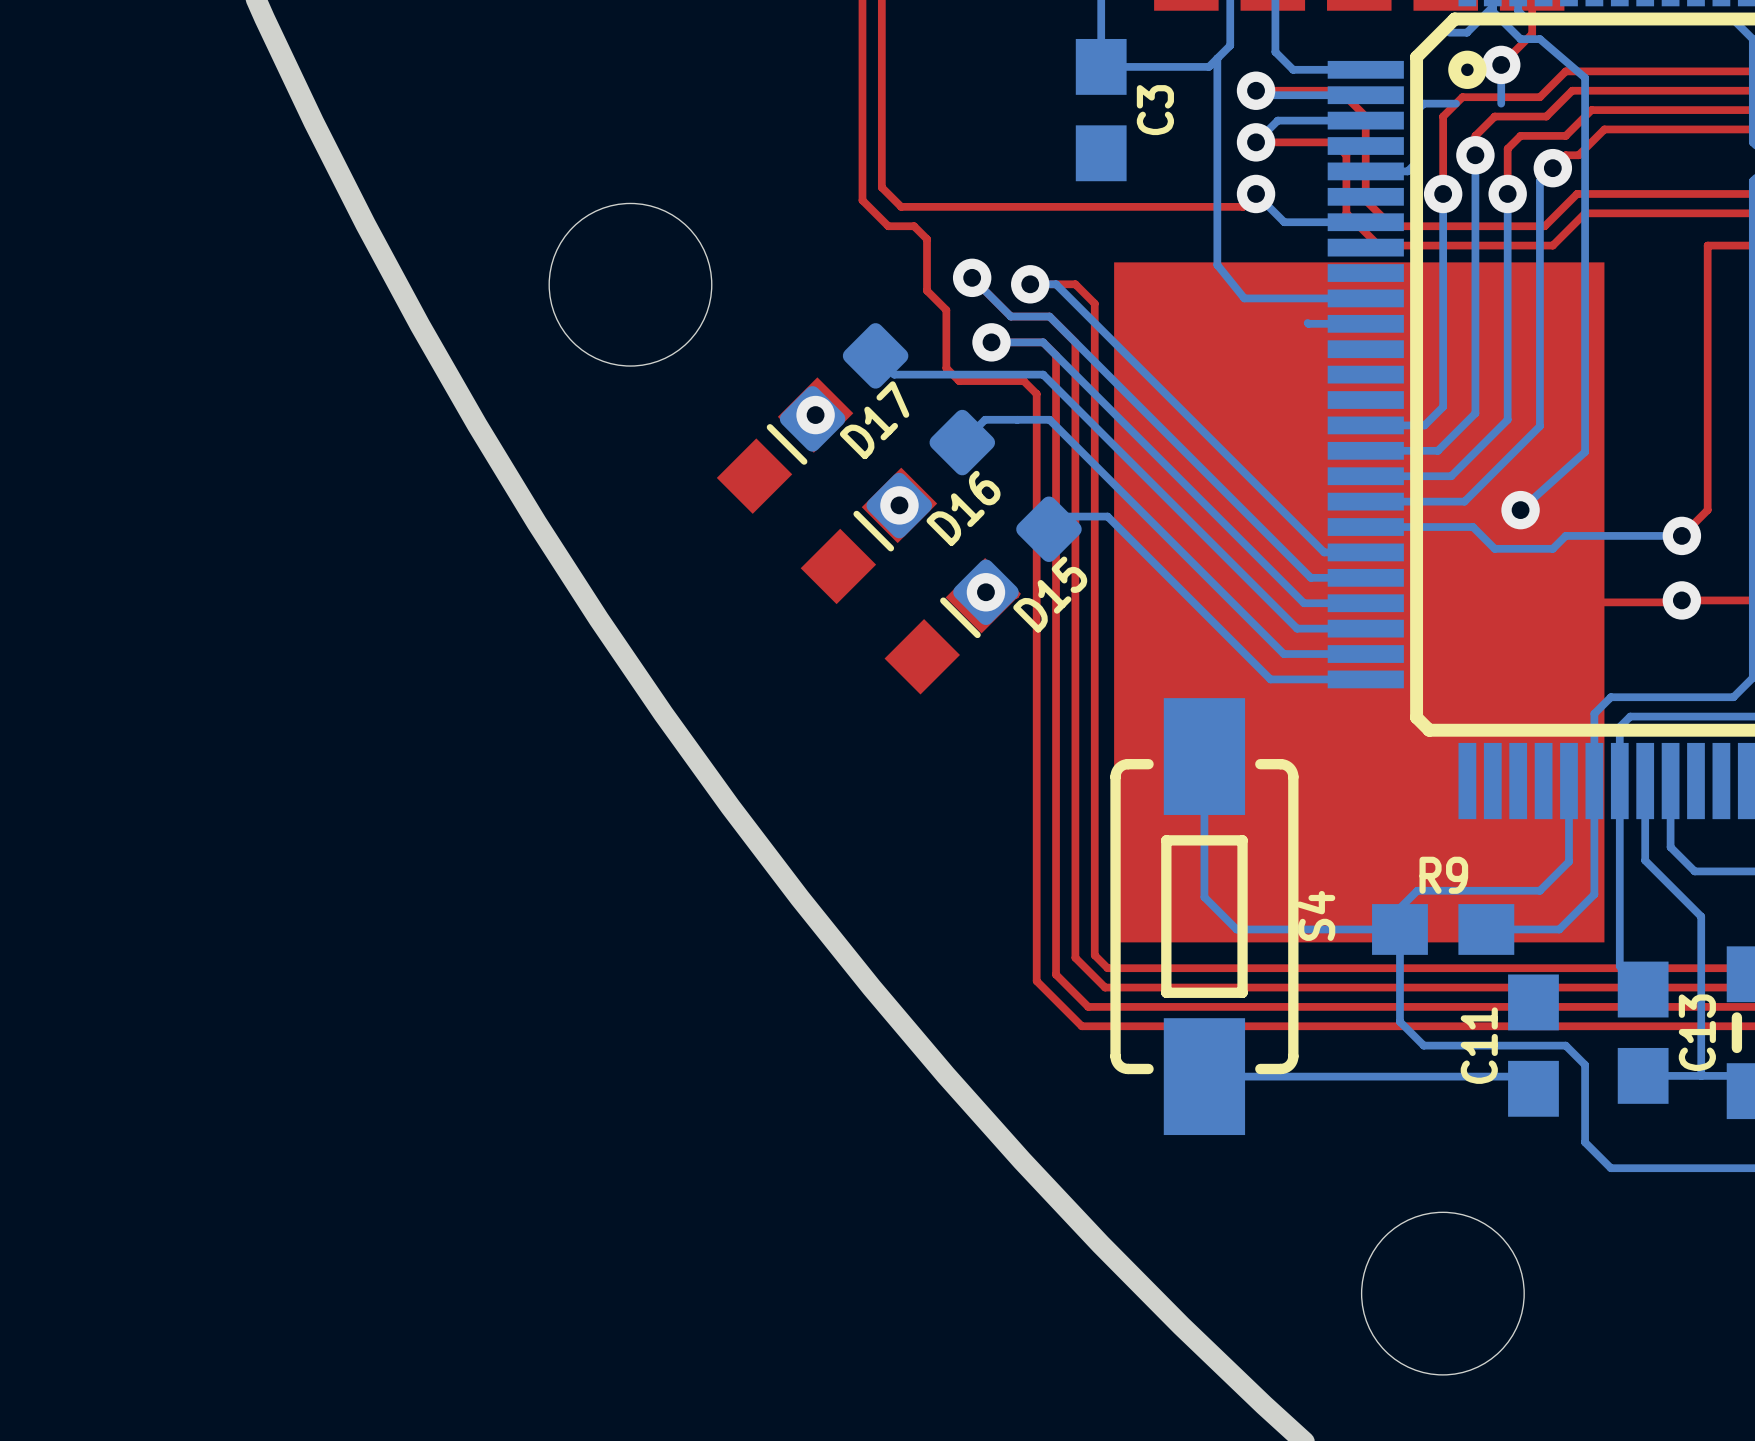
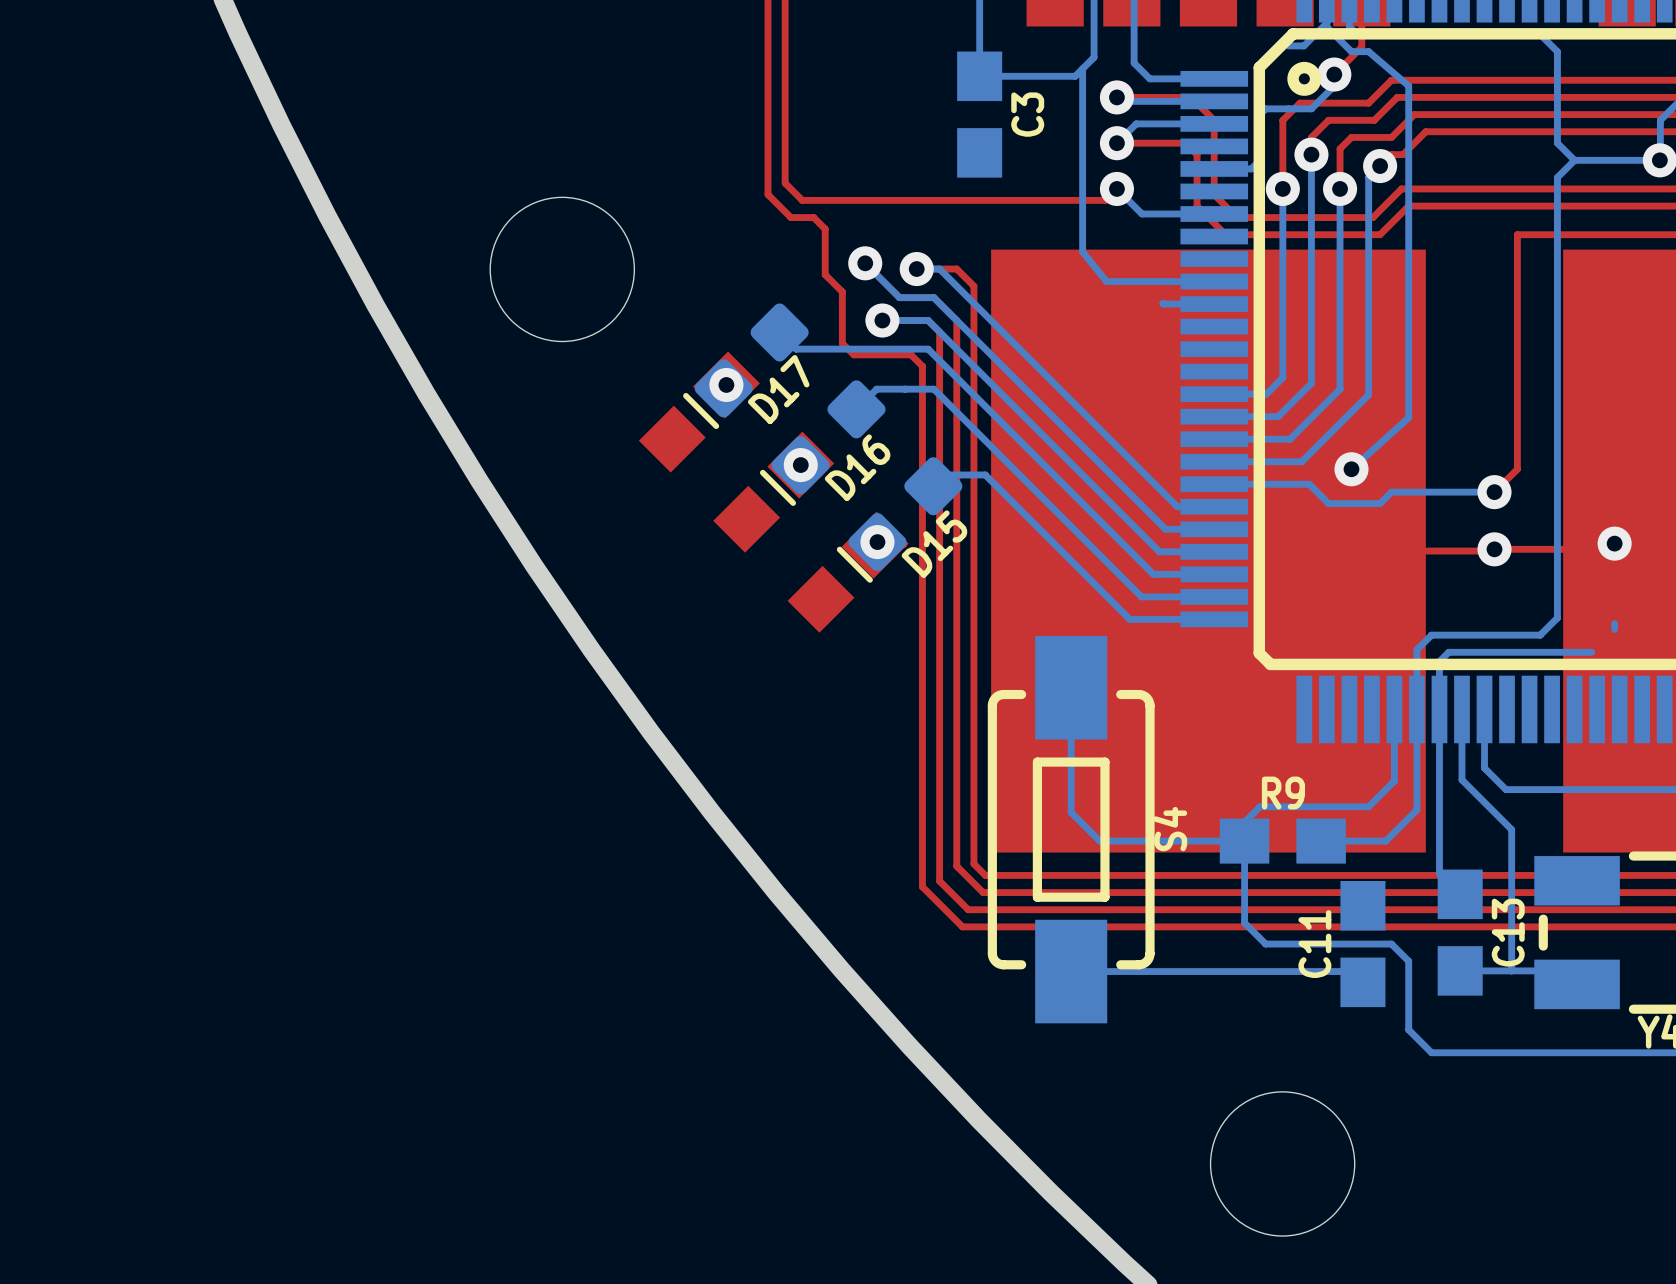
bottom track: (1501, 77) (1501, 103) -> (1334, 85) (1311, 108) (1294, 108)

